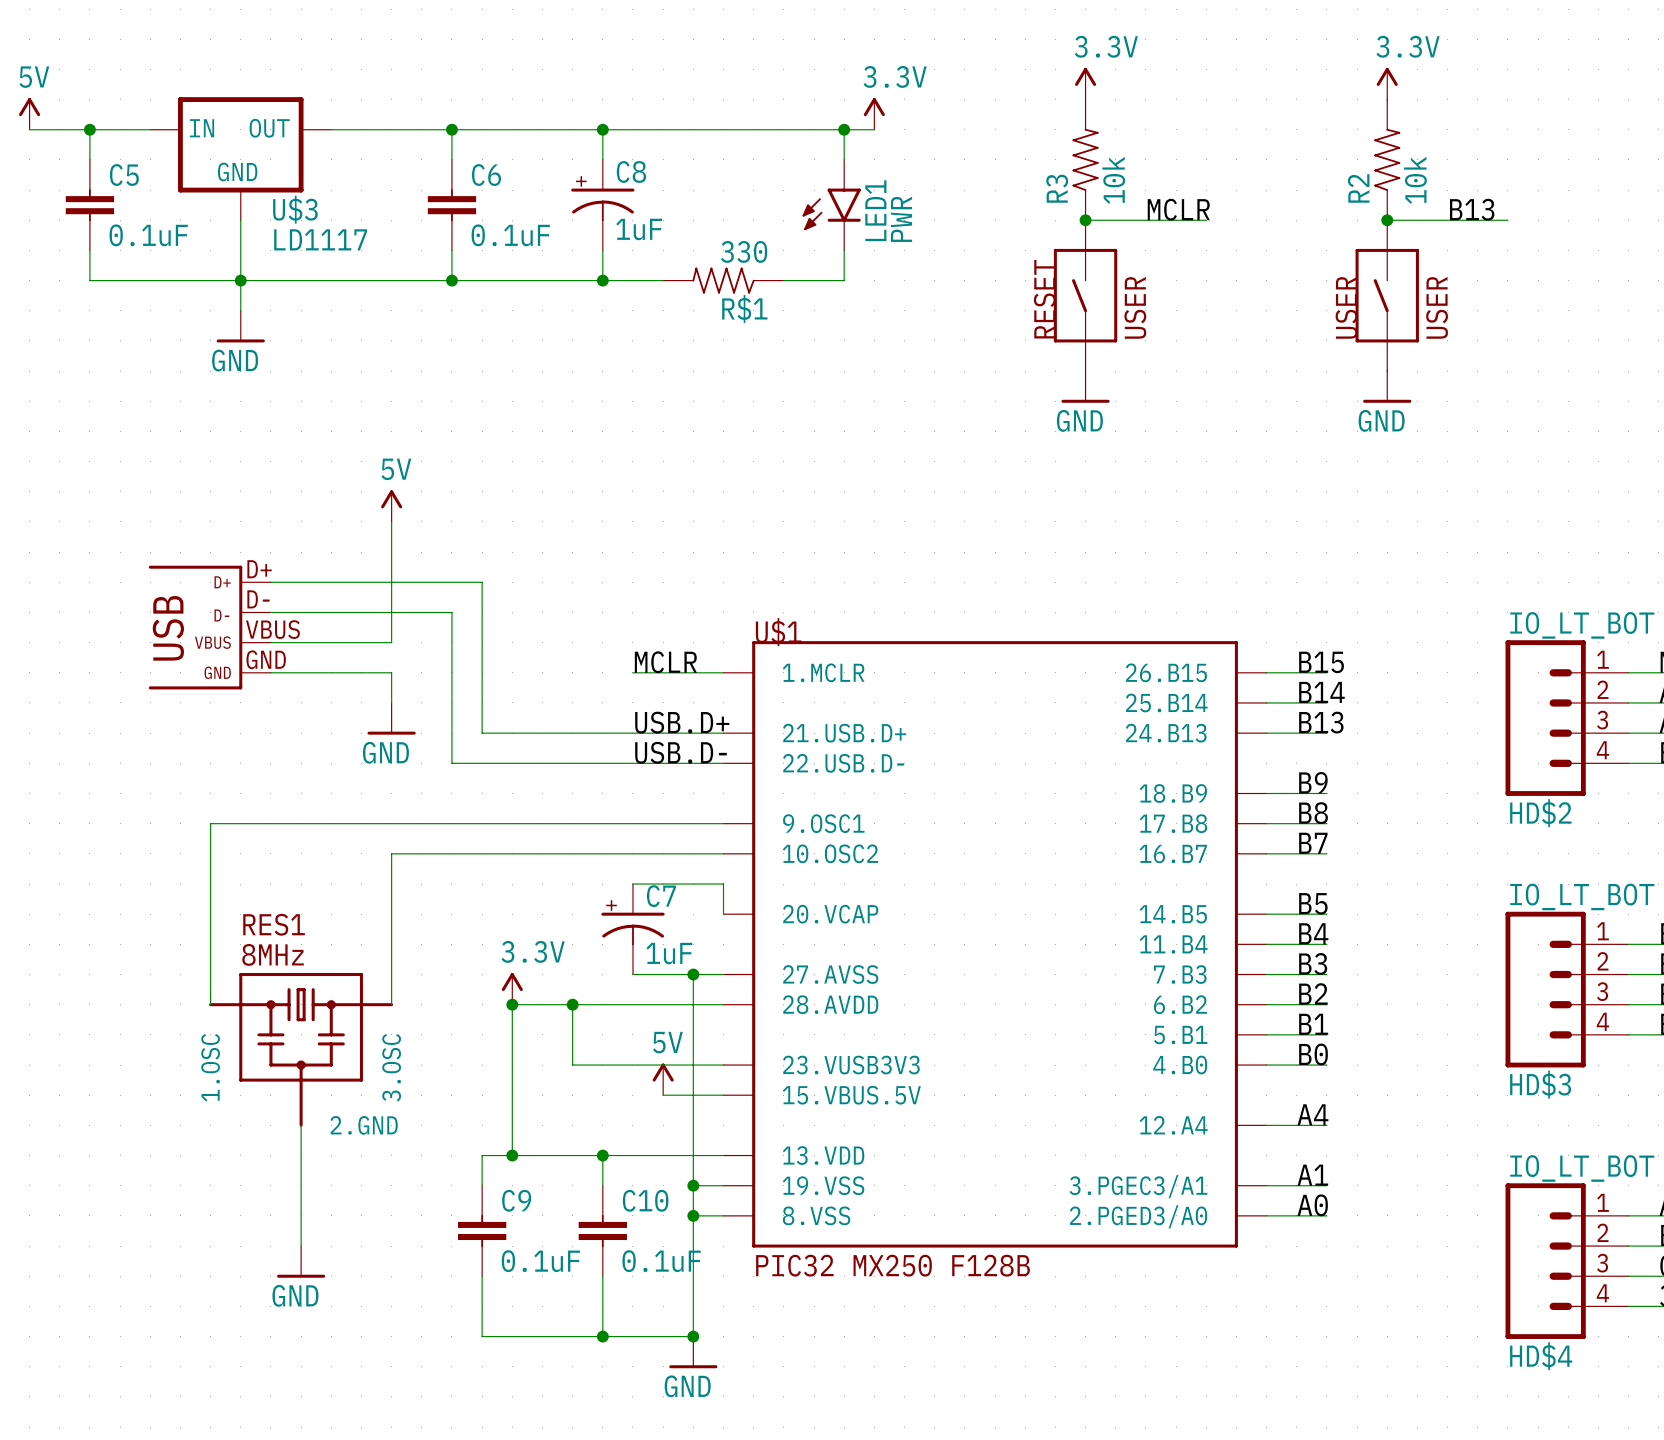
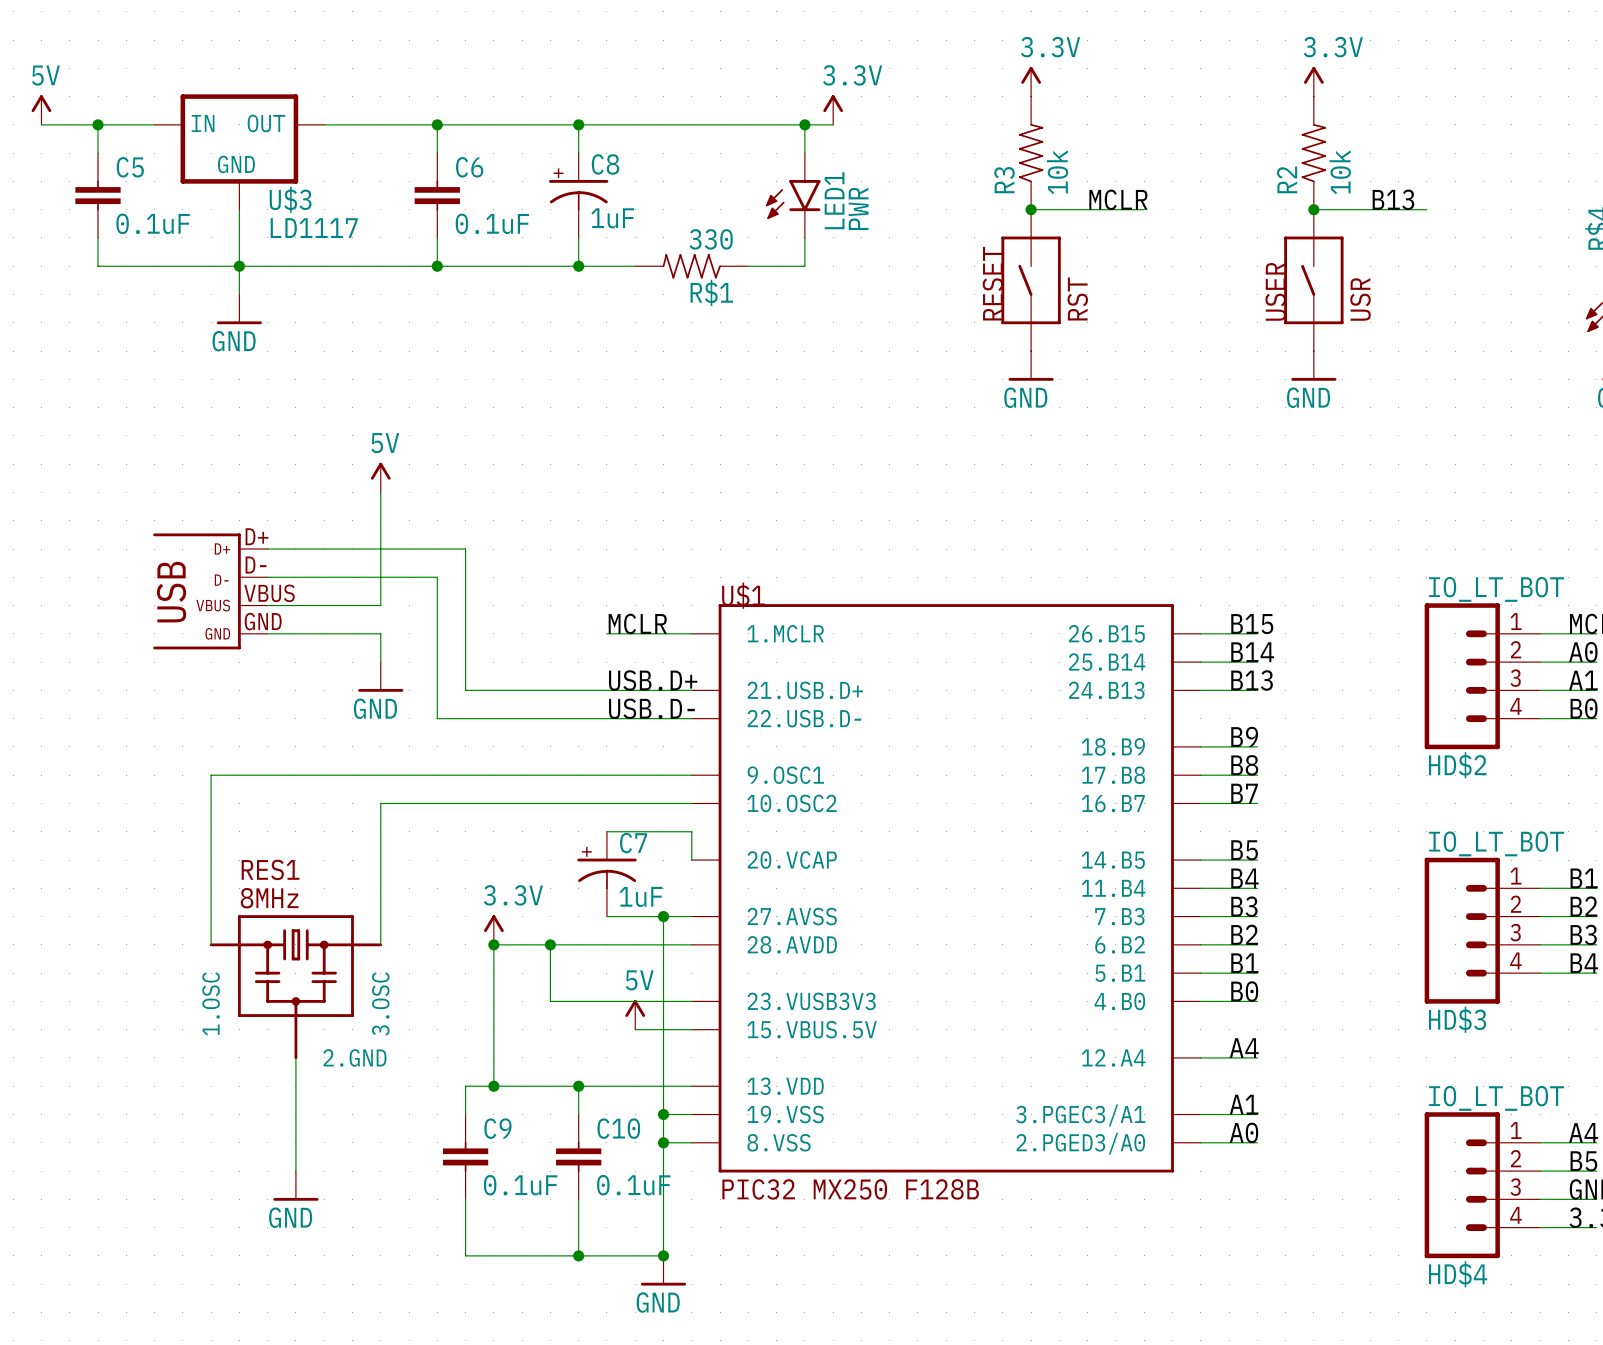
RESET value: USER (1135, 307) -> RST (1077, 299)
USER value: USER (1437, 307) -> USR (1360, 299)

